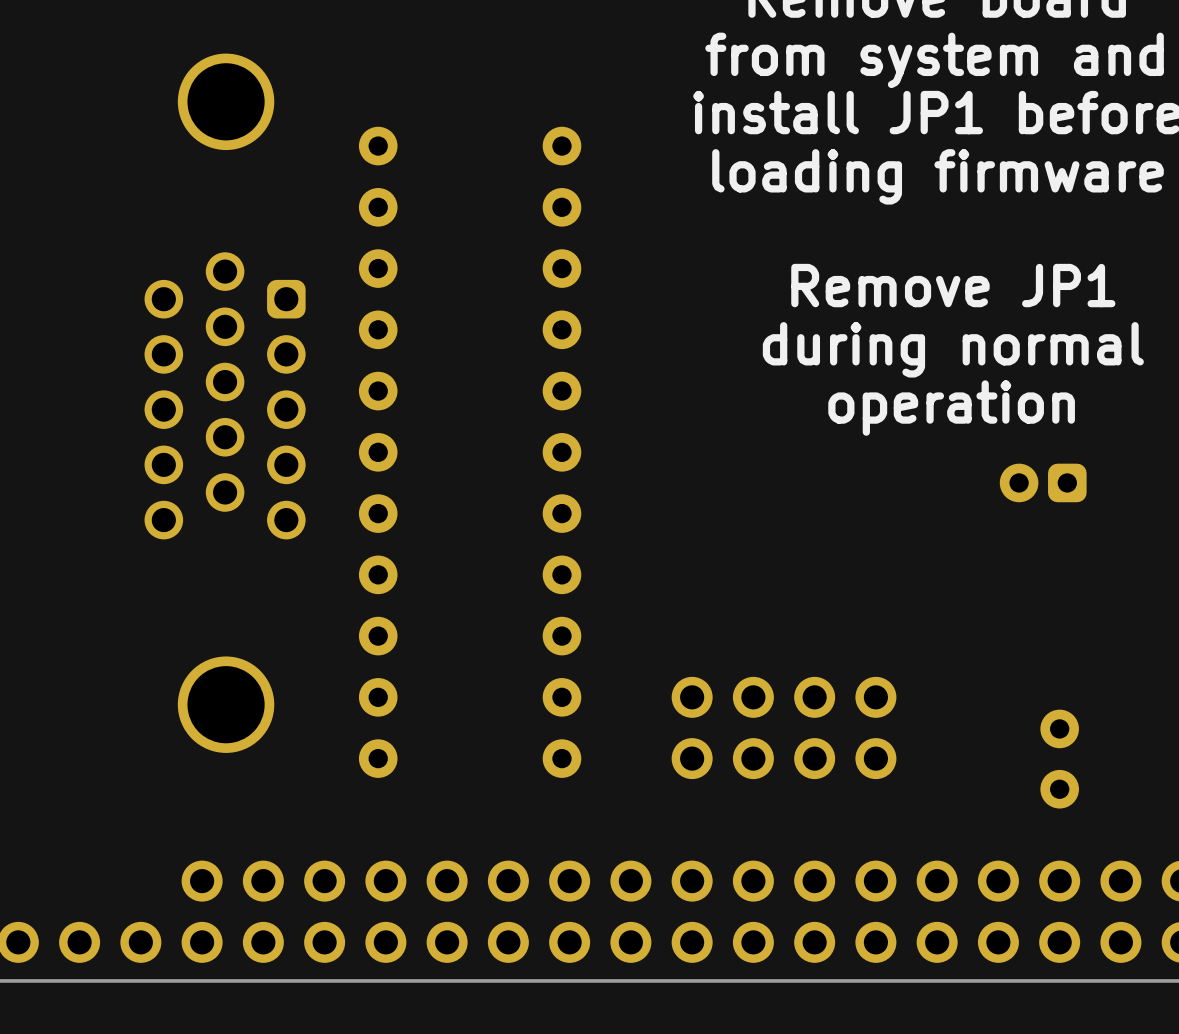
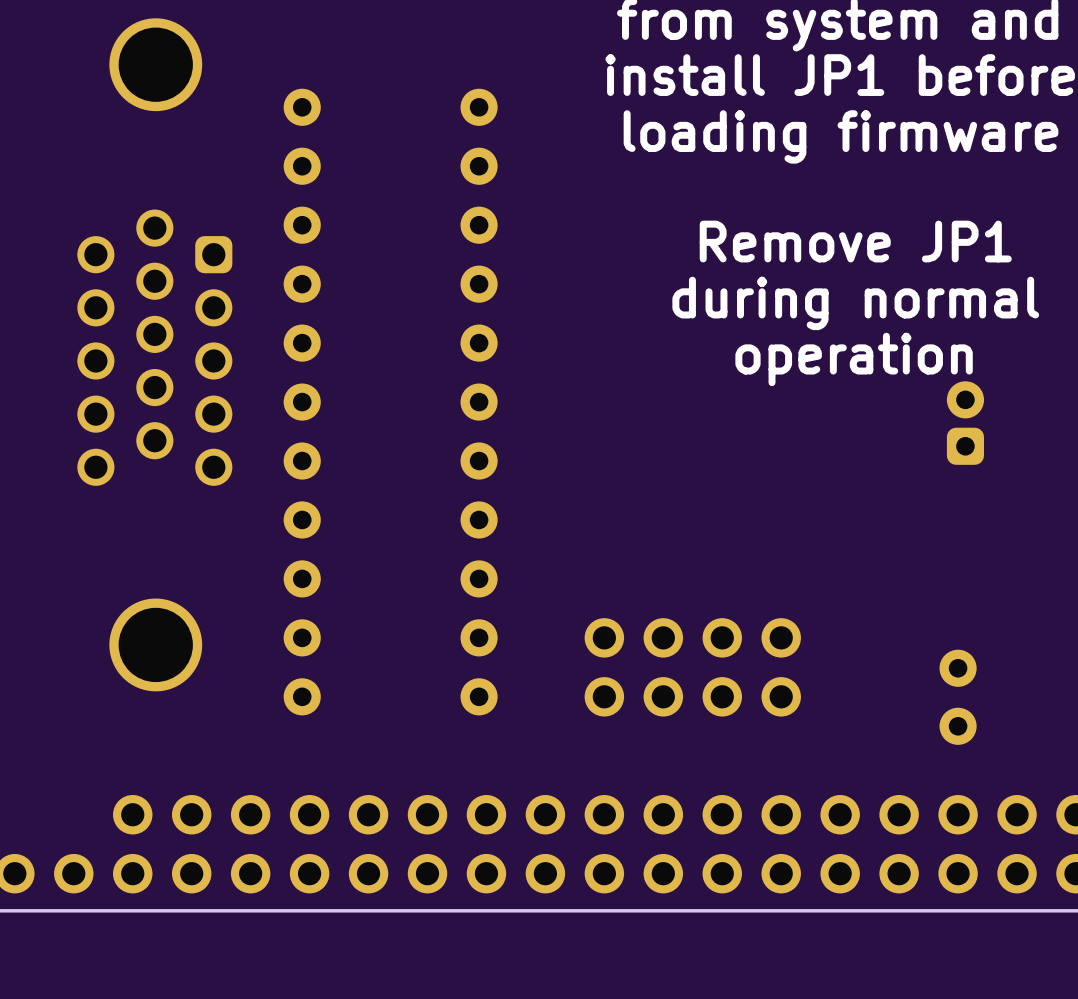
part rotation: 0° (1043, 482) -> 90° clockwise (965, 423)

